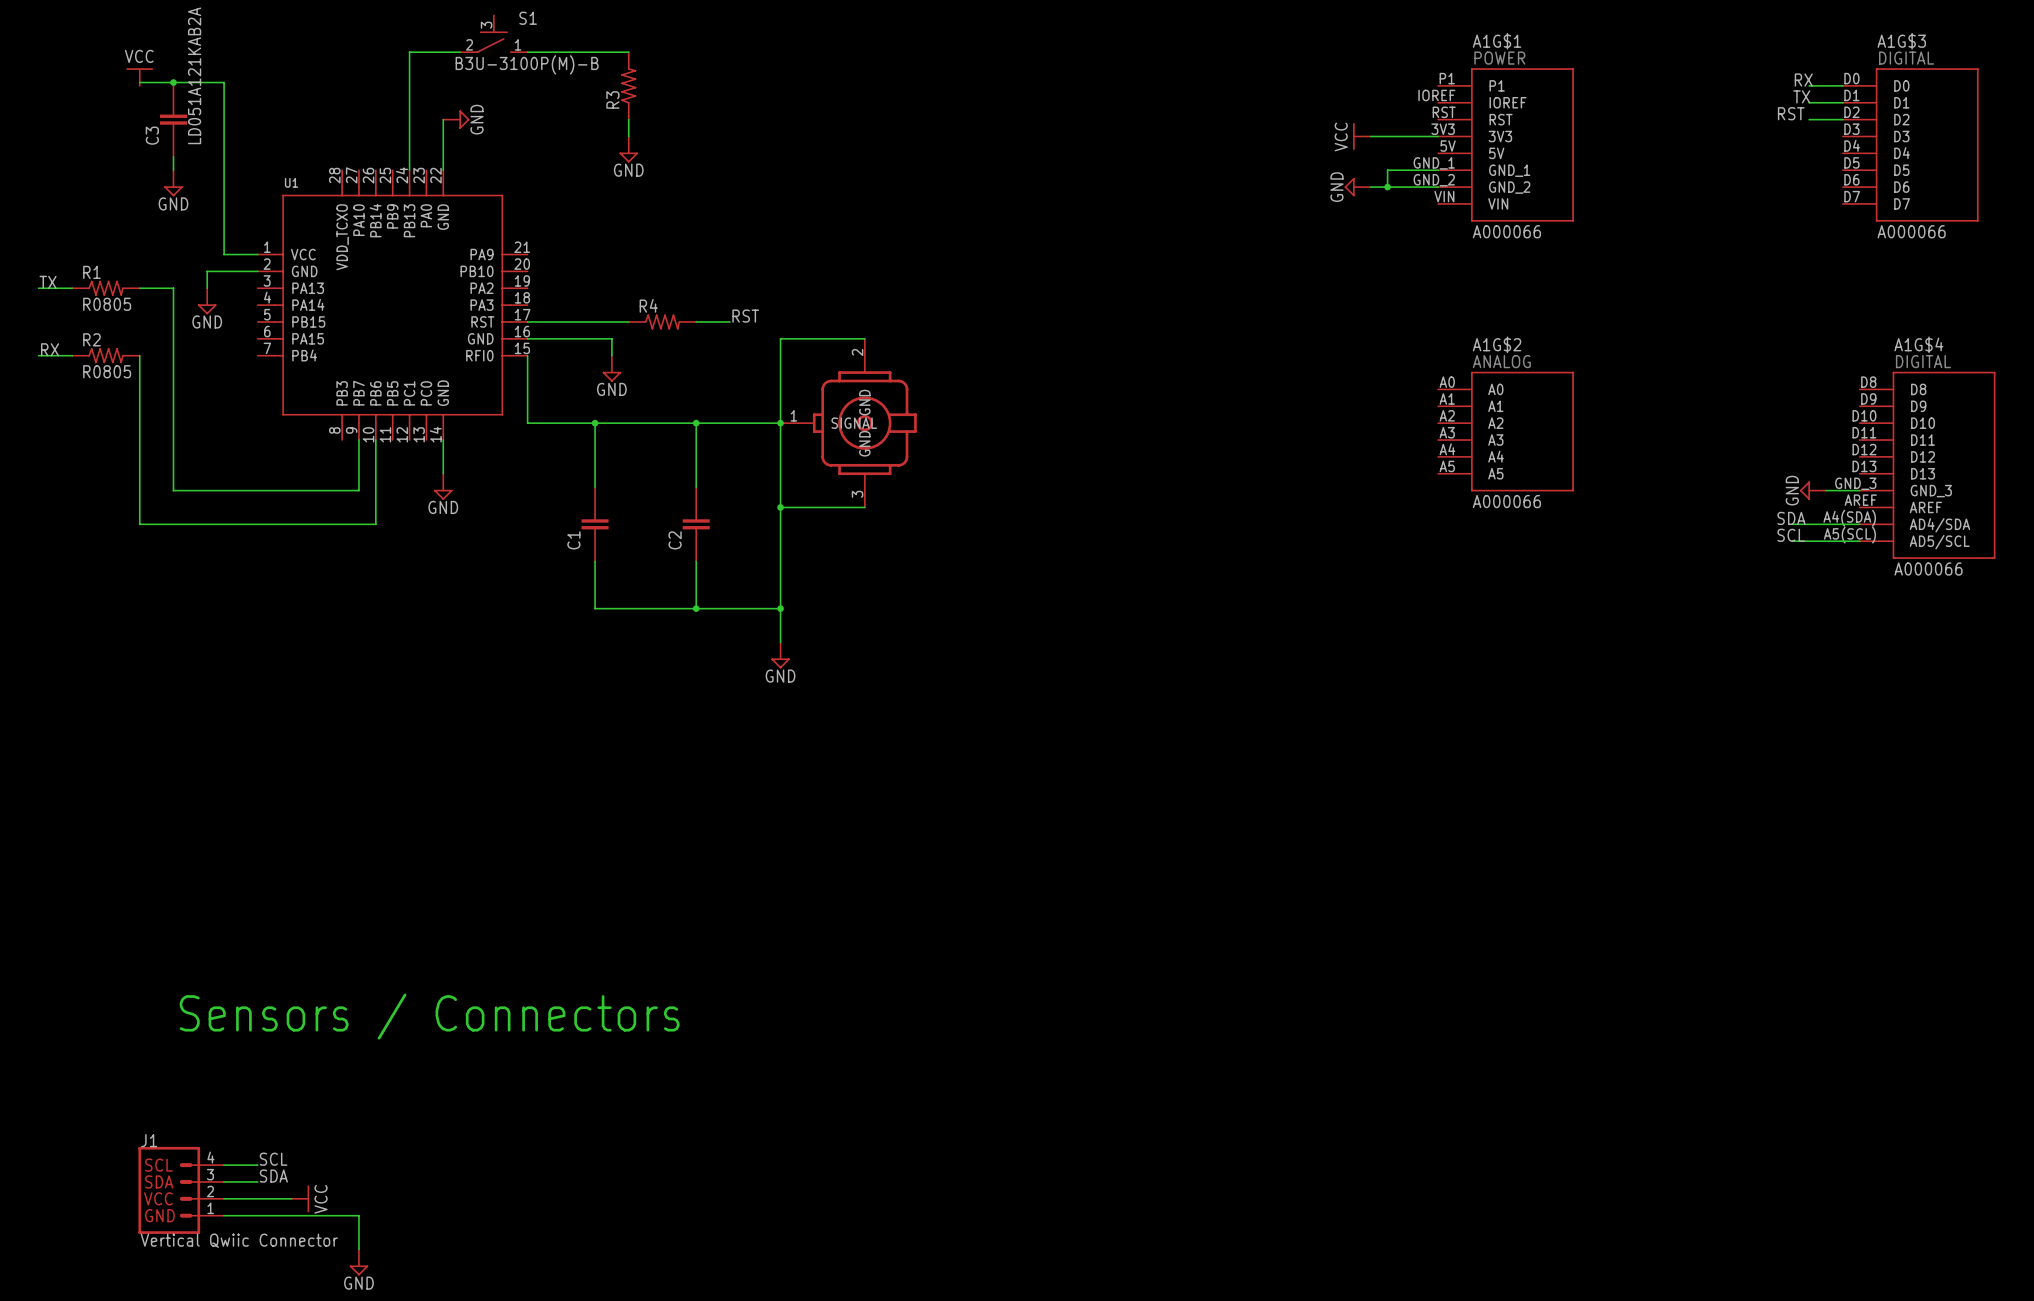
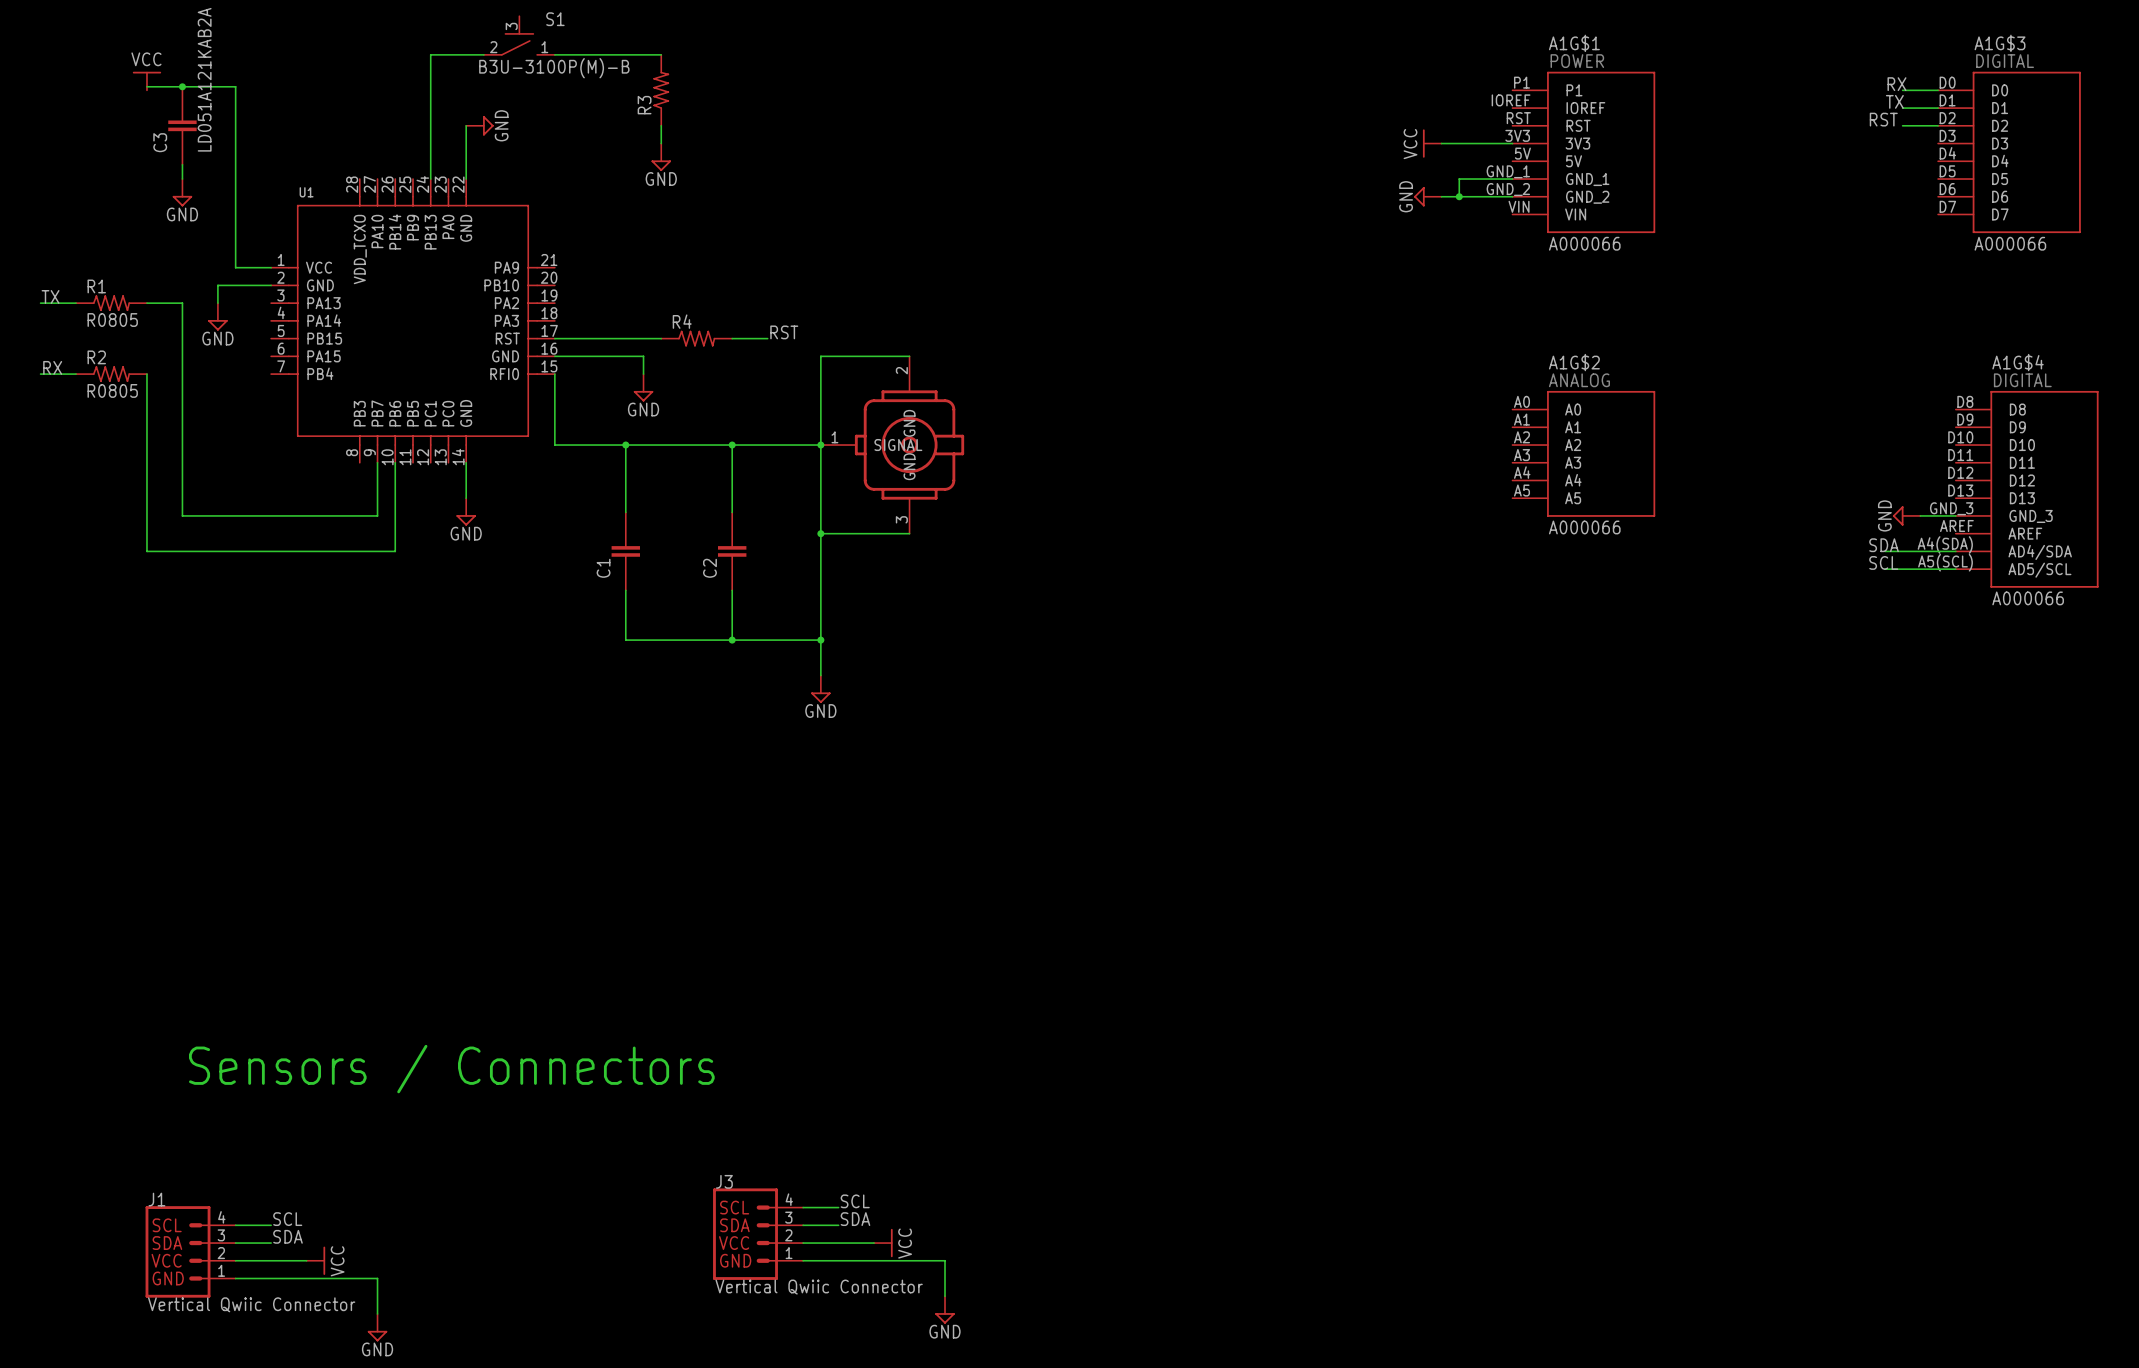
label: none -> SCL (855, 1201)
wire: none -> (803, 1207) (838, 1207)
label: none -> SDA (855, 1219)
wire: none -> (803, 1225) (838, 1225)
J3: none -> Vertical Qwiic Connector (758, 1234)
wire: none -> (803, 1243) (874, 1243)
power symbol: none -> VCC (883, 1243)
wire: none -> (803, 1260) (945, 1260) (945, 1296)
power symbol: none -> GND (945, 1309)

